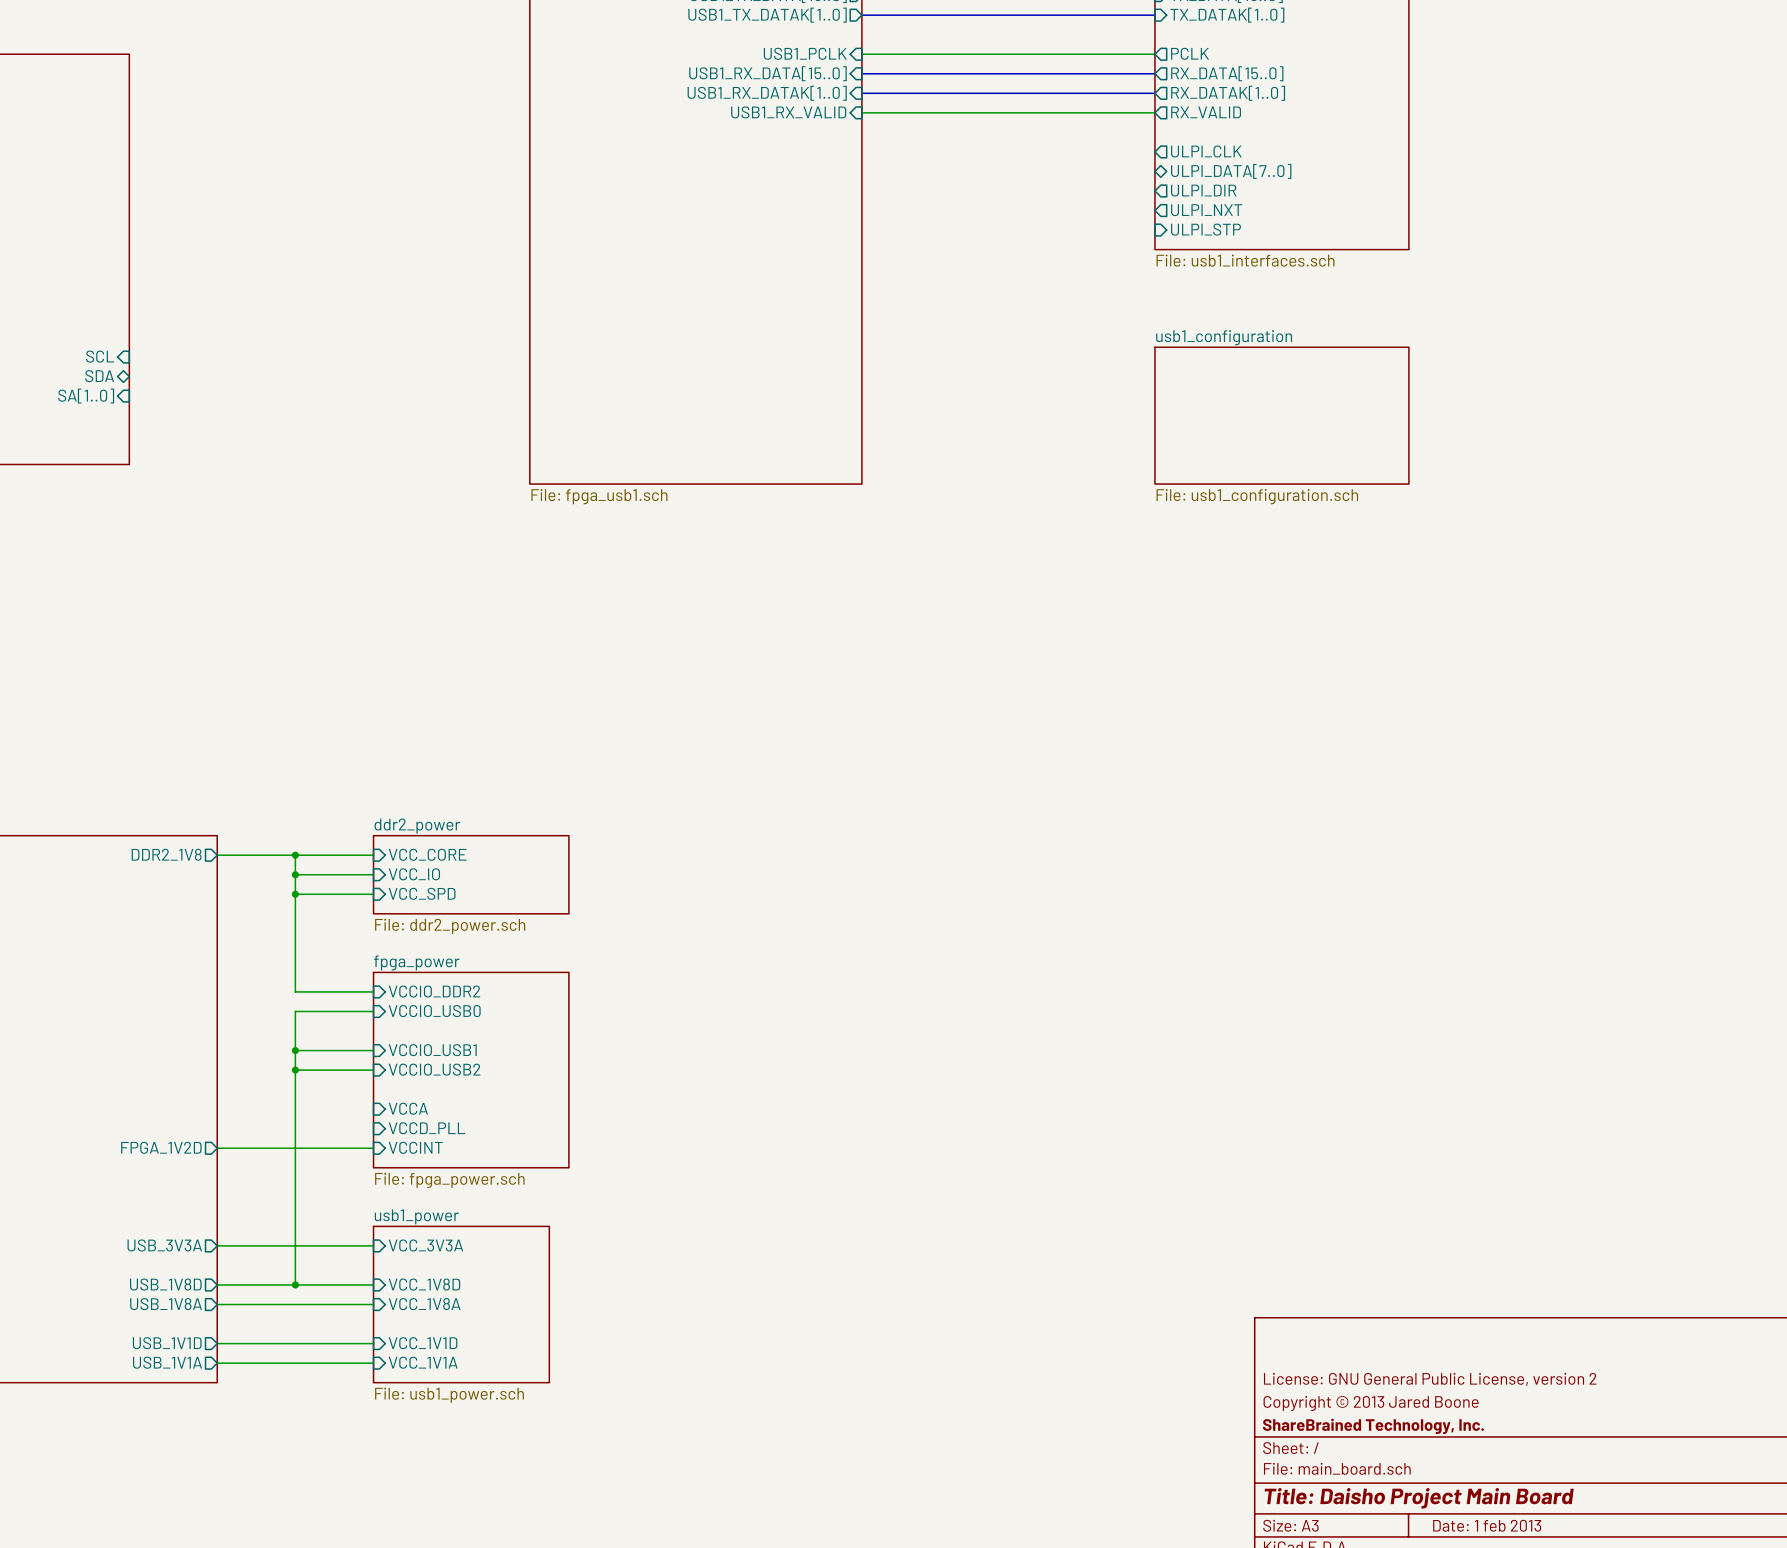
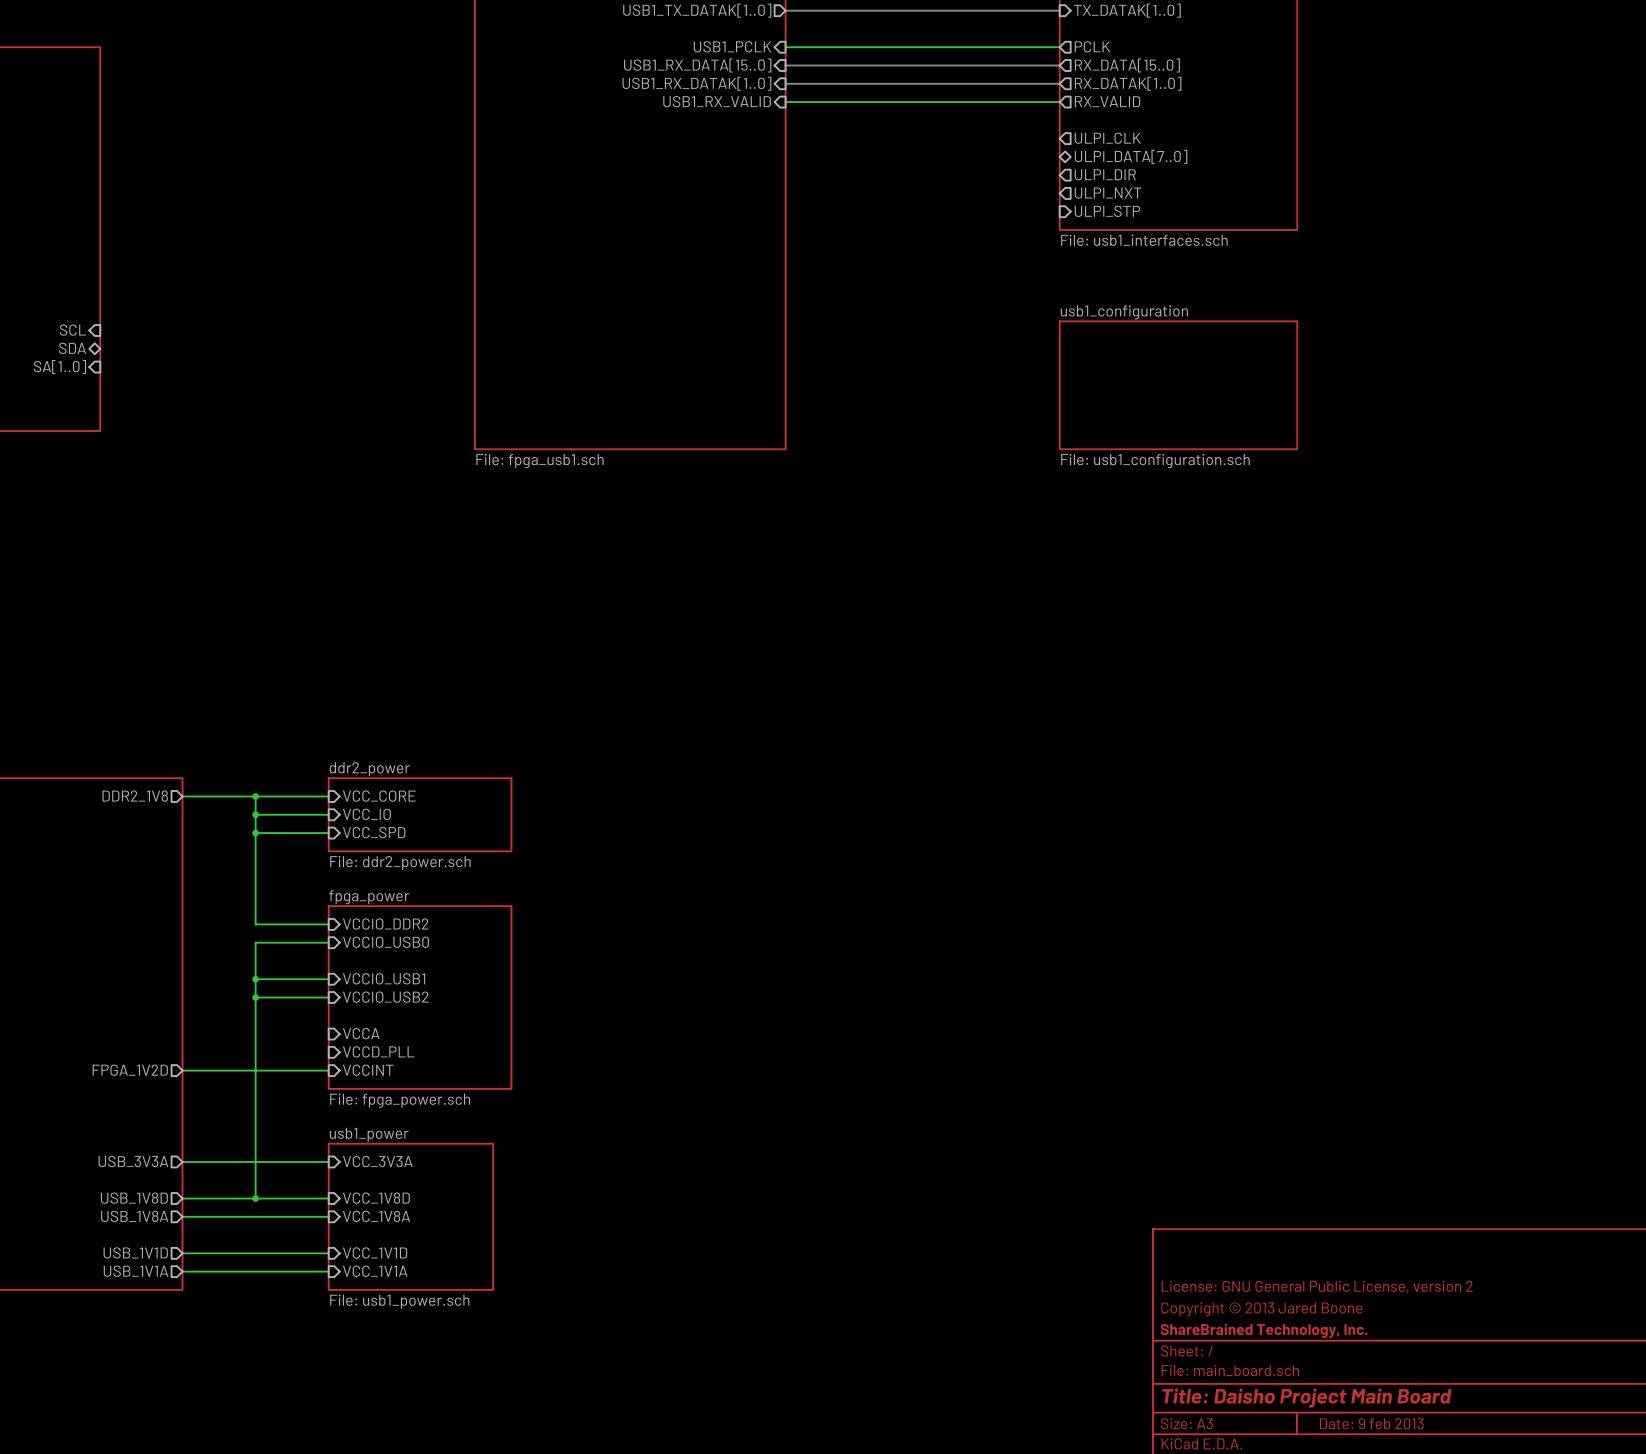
title block: Date: 1 feb 2013 (1487, 1525) -> Date: 9 feb 2013 (1371, 1423)

